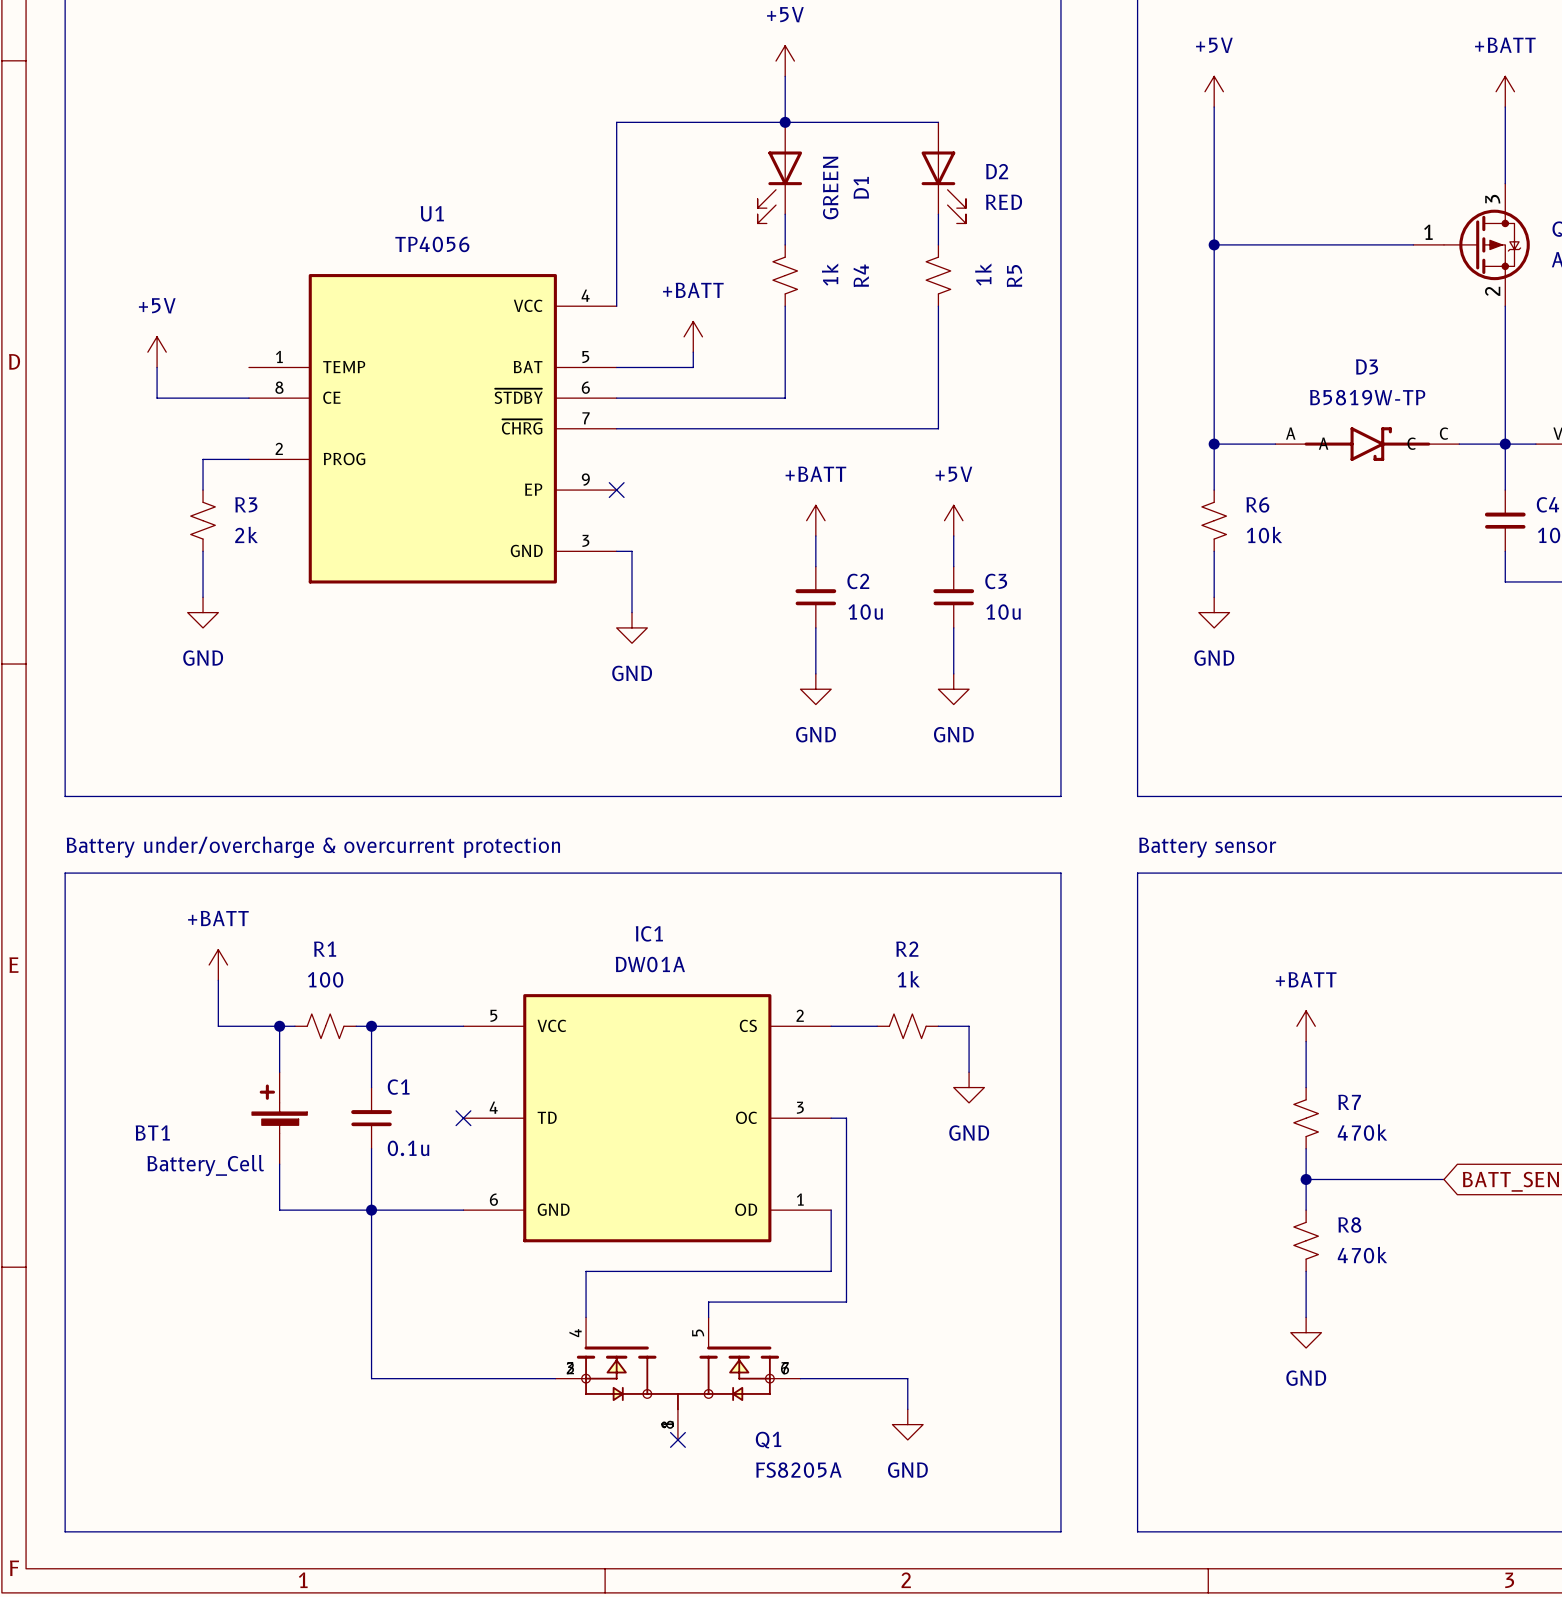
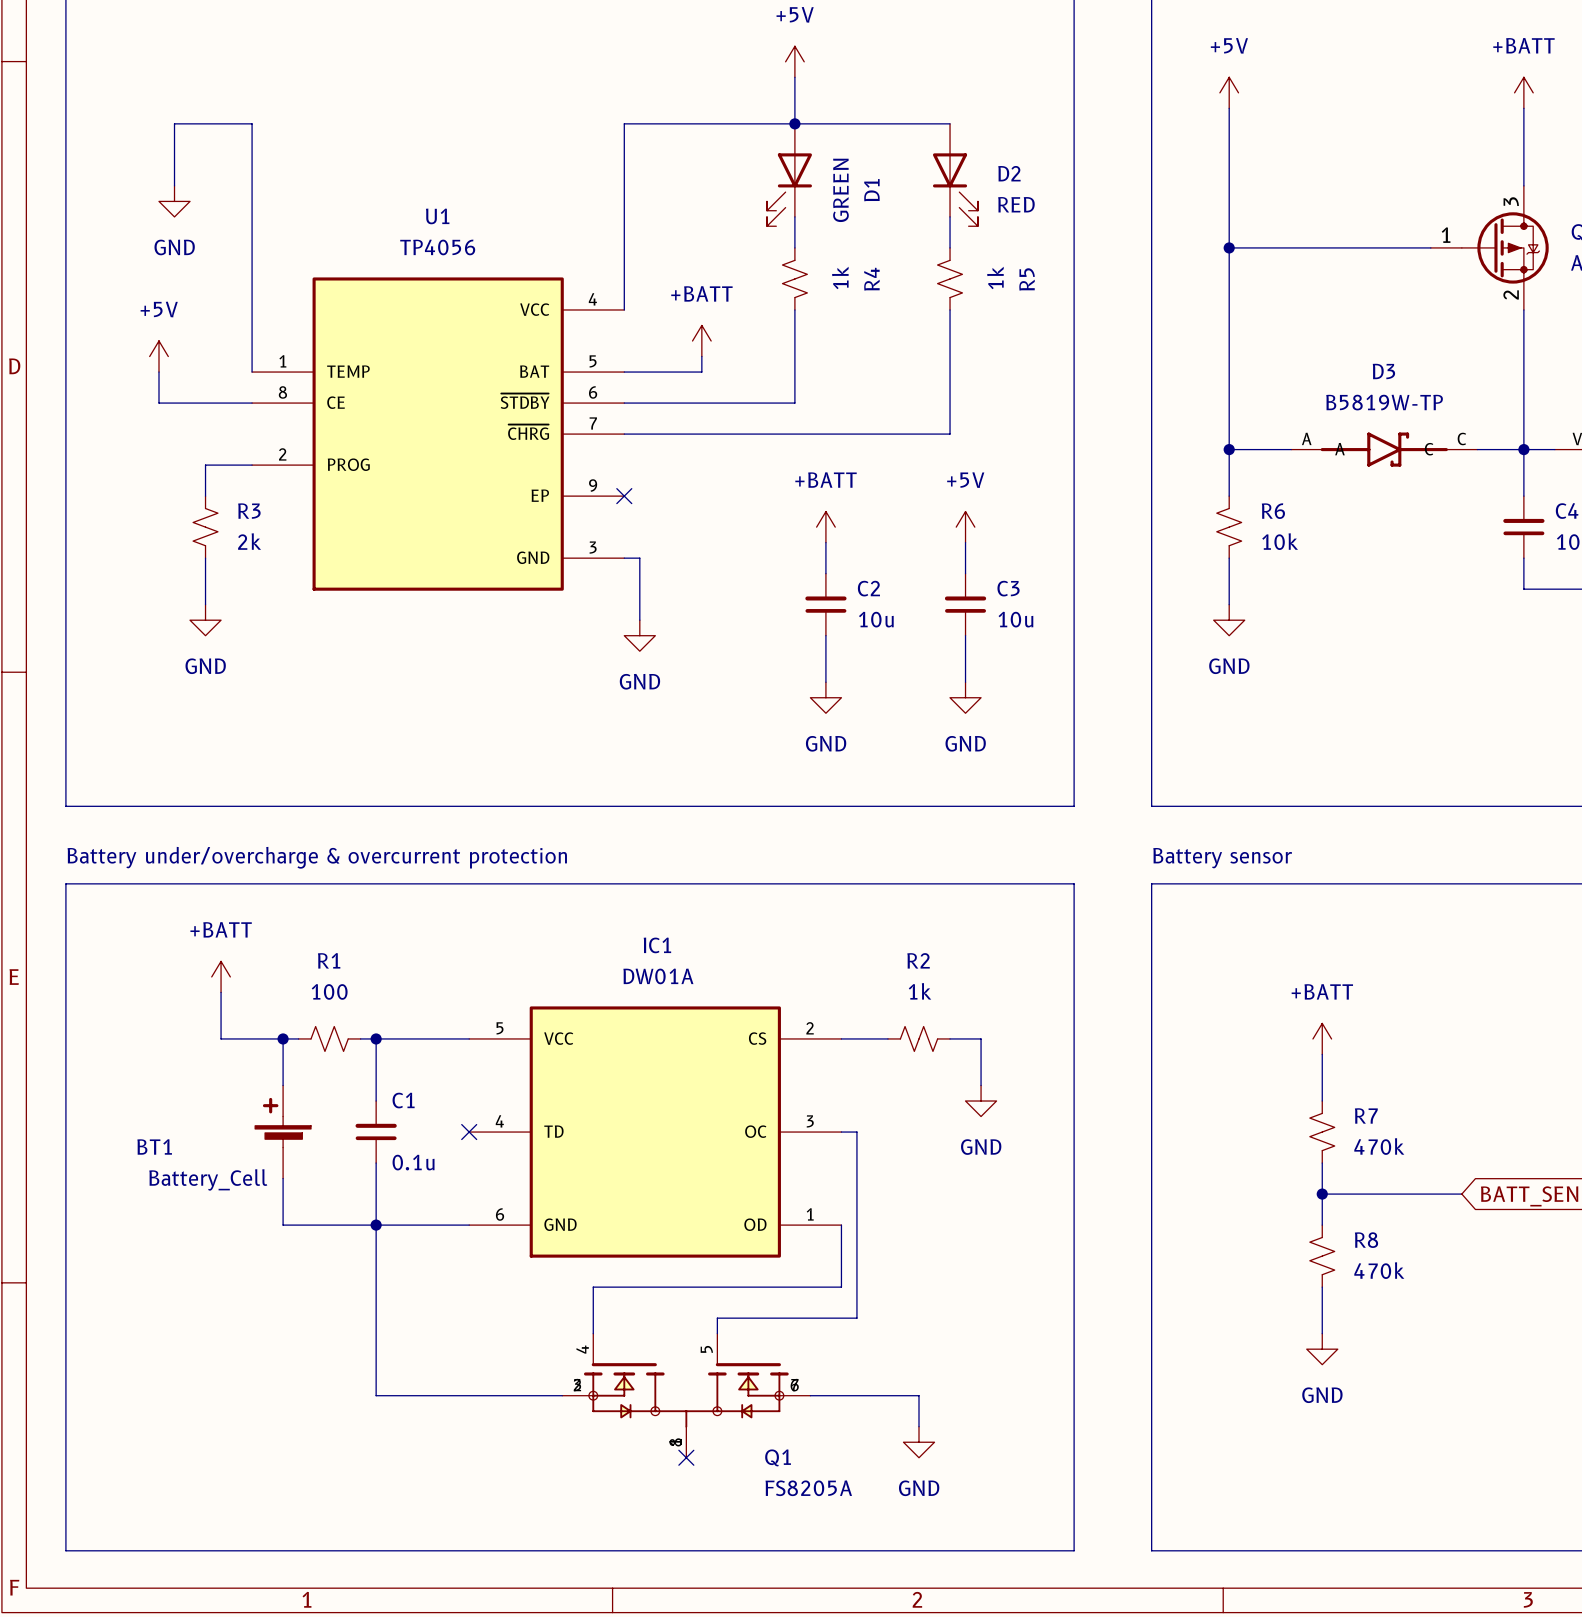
wire: none -> (174, 185) (174, 123) (252, 123) (252, 372)
power symbol: none -> GND (174, 201)

